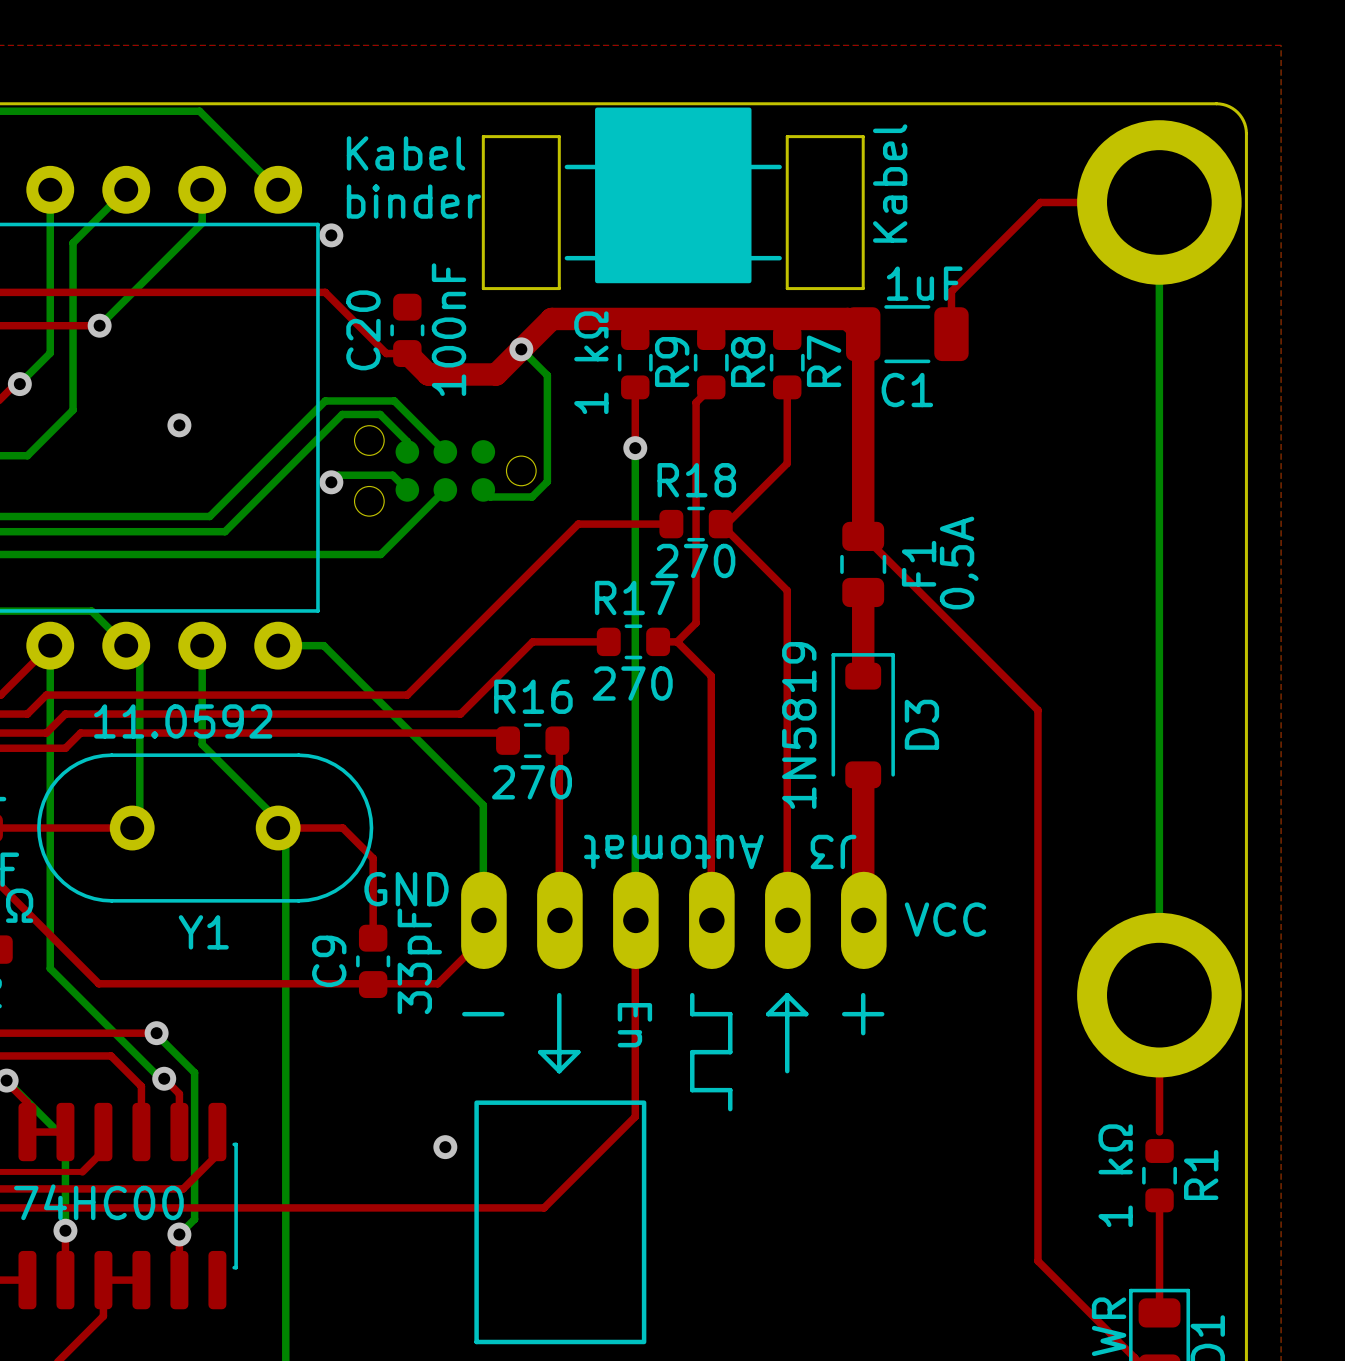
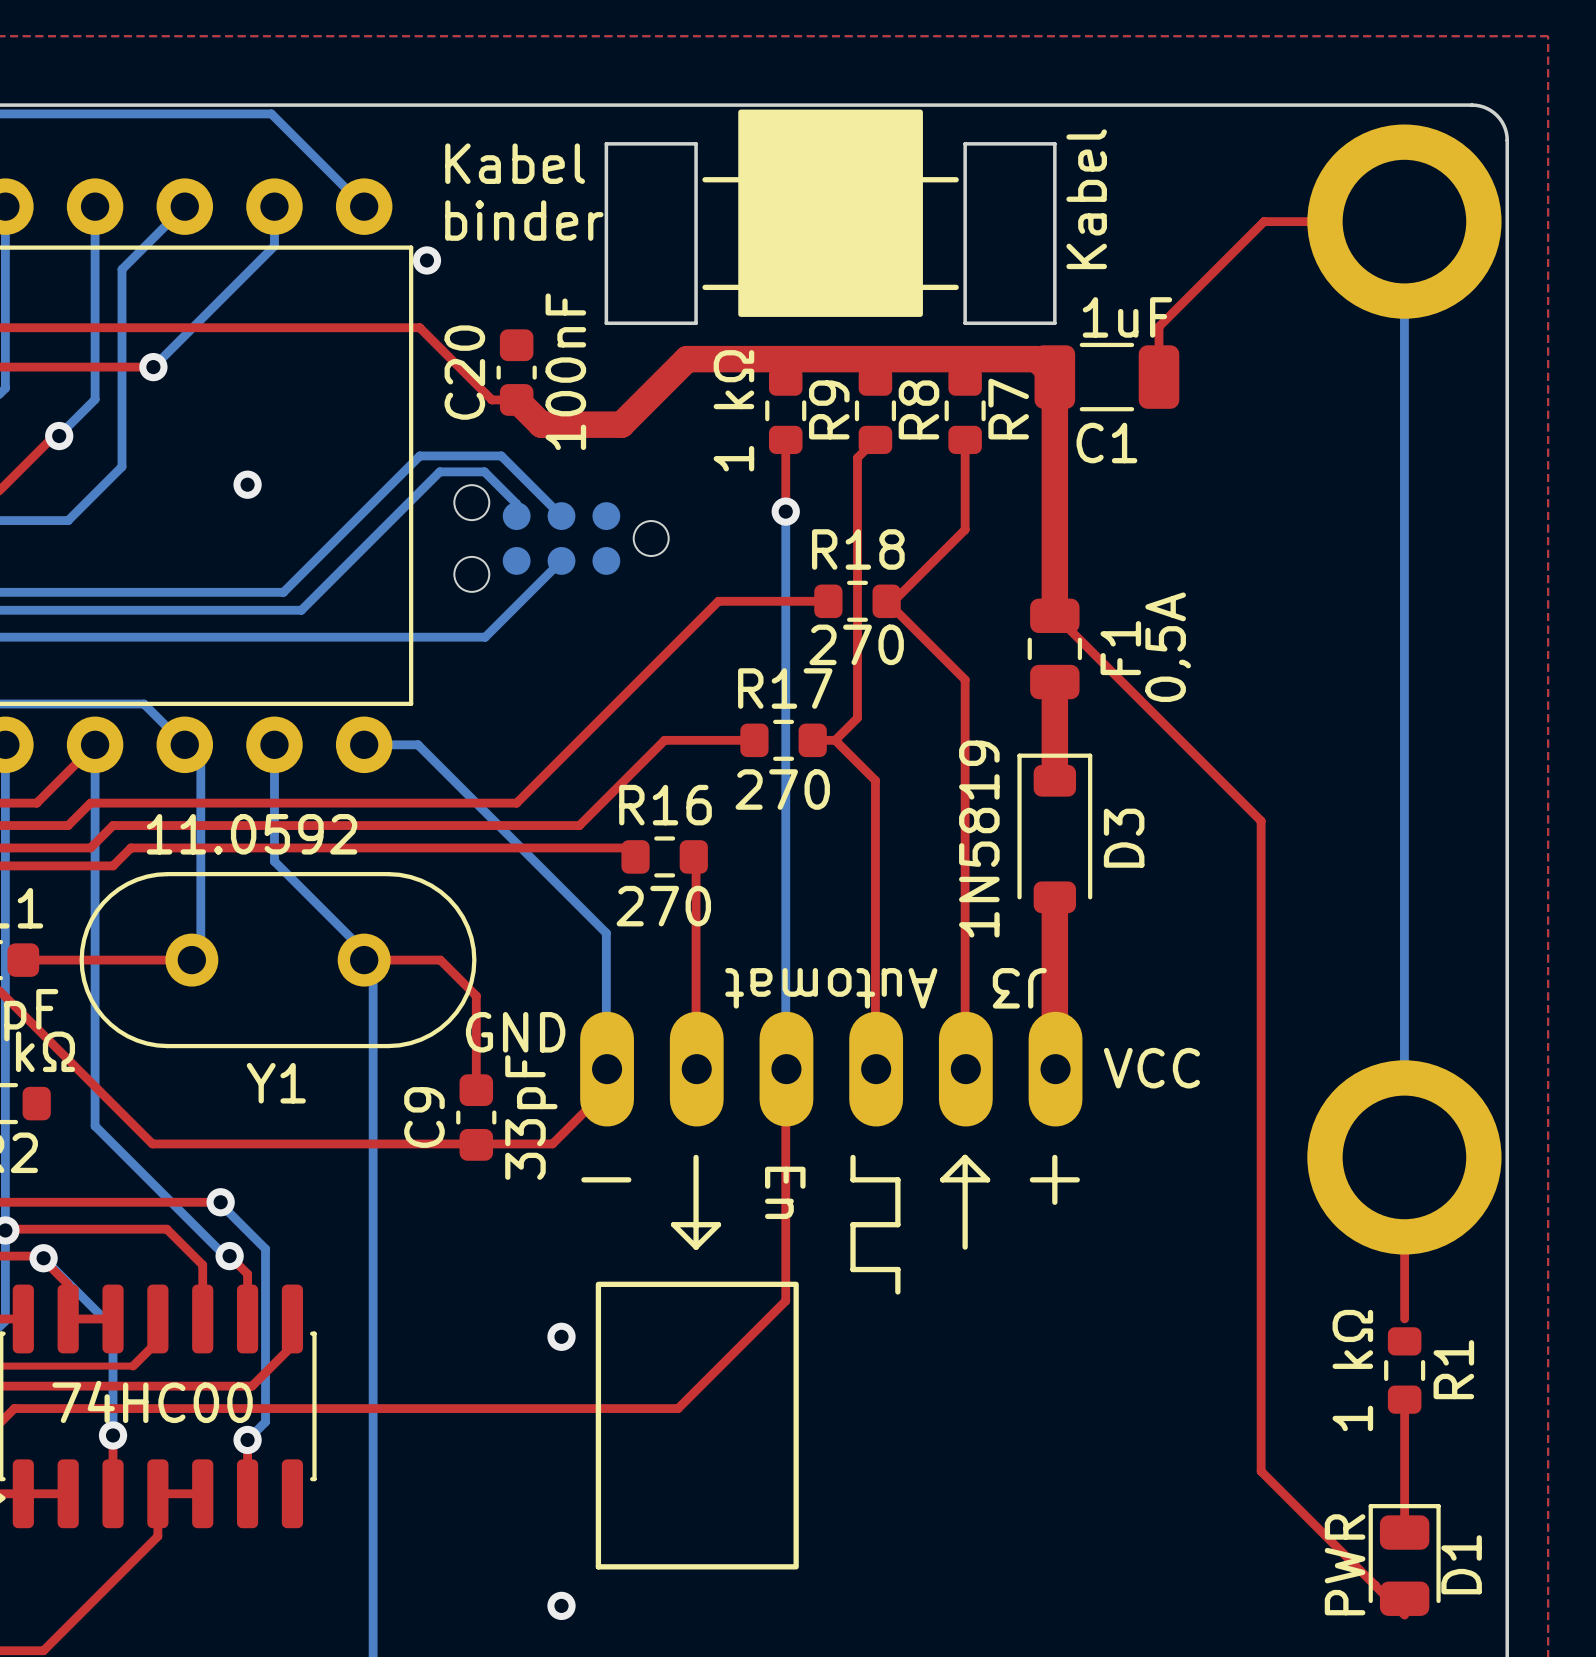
bottom track: (521, 349) (547, 375) (547, 481) (532, 496) (490, 496) (483, 489) -> none
via: (521, 349) -> none
bottom track: (331, 482) (338, 475) (392, 475) (407, 489) -> none
via: (331, 482) -> none

